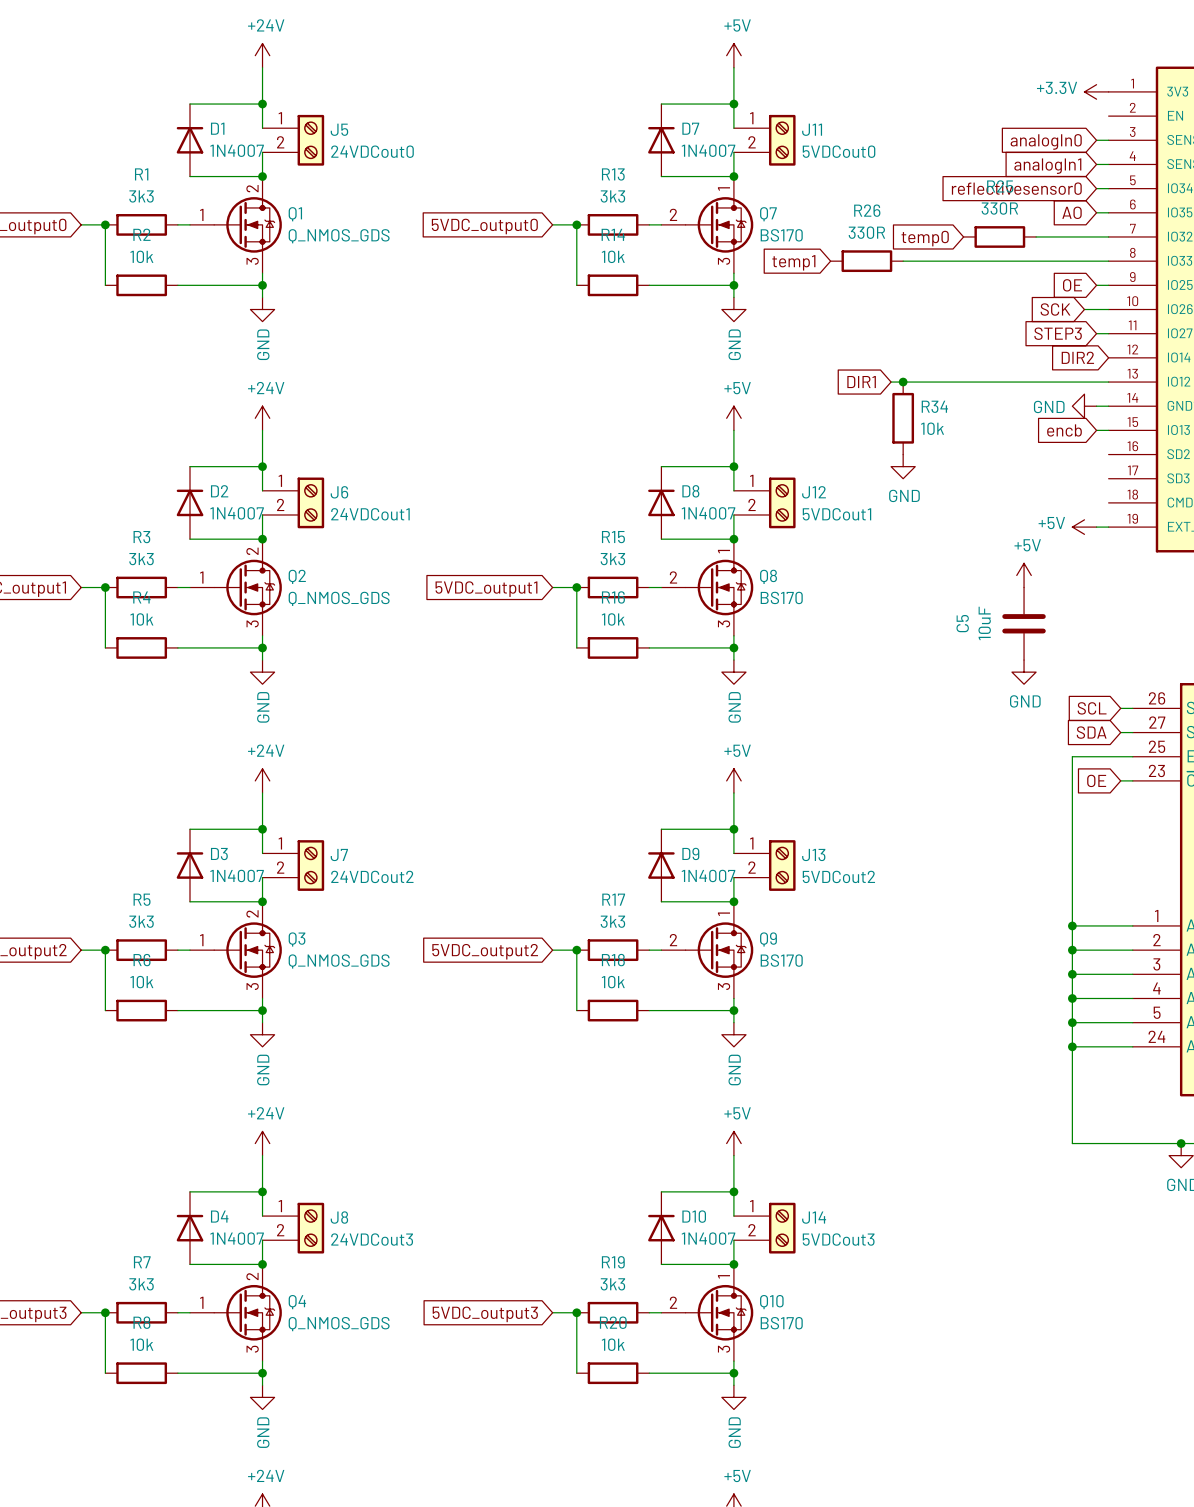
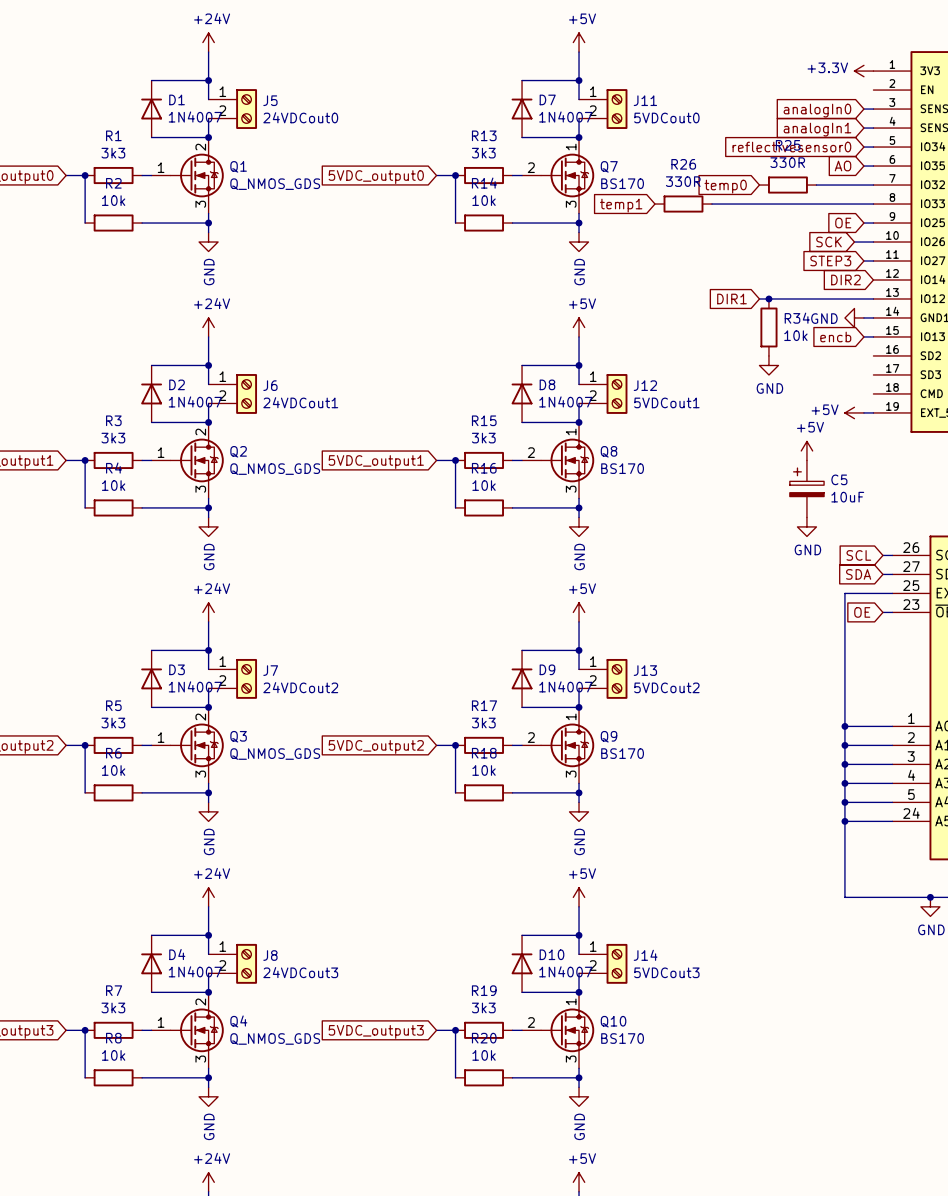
global label position: DIR1 (861, 382) -> DIR1 (731, 298)
wire: (891, 382) (963, 382) -> none
junction: (903, 382) -> none
junction: none -> (768, 298)
R34 position: (903, 418) -> (768, 327)
power symbol position: GND (903, 466) -> GND (768, 365)
C5 symbol: [1002, 587, 1046, 661] -> [789, 460, 825, 518]
C5 name position: C5 (962, 623) -> C5 (839, 479)
C5 value position: 10uF (984, 623) -> 10uF (847, 497)

